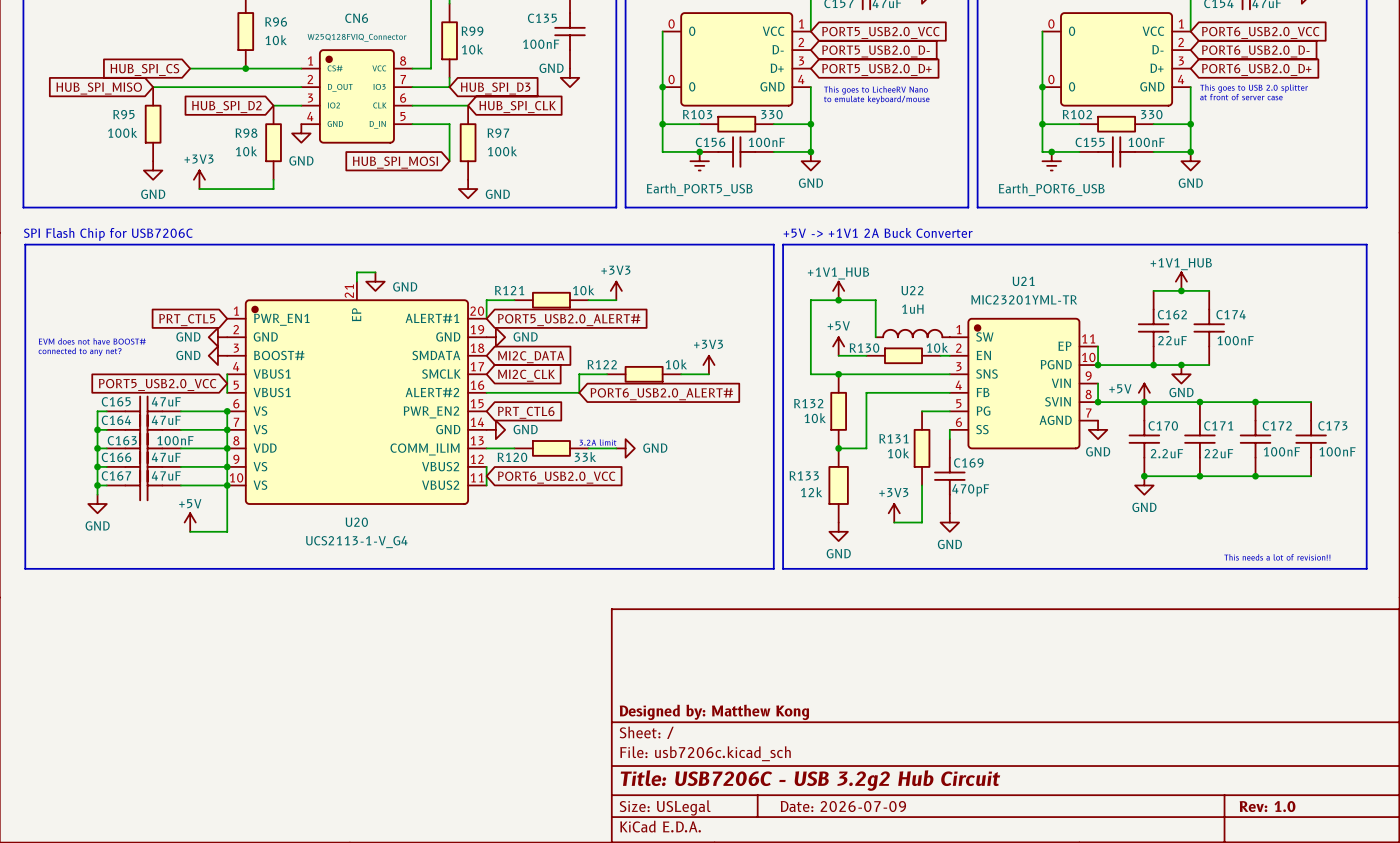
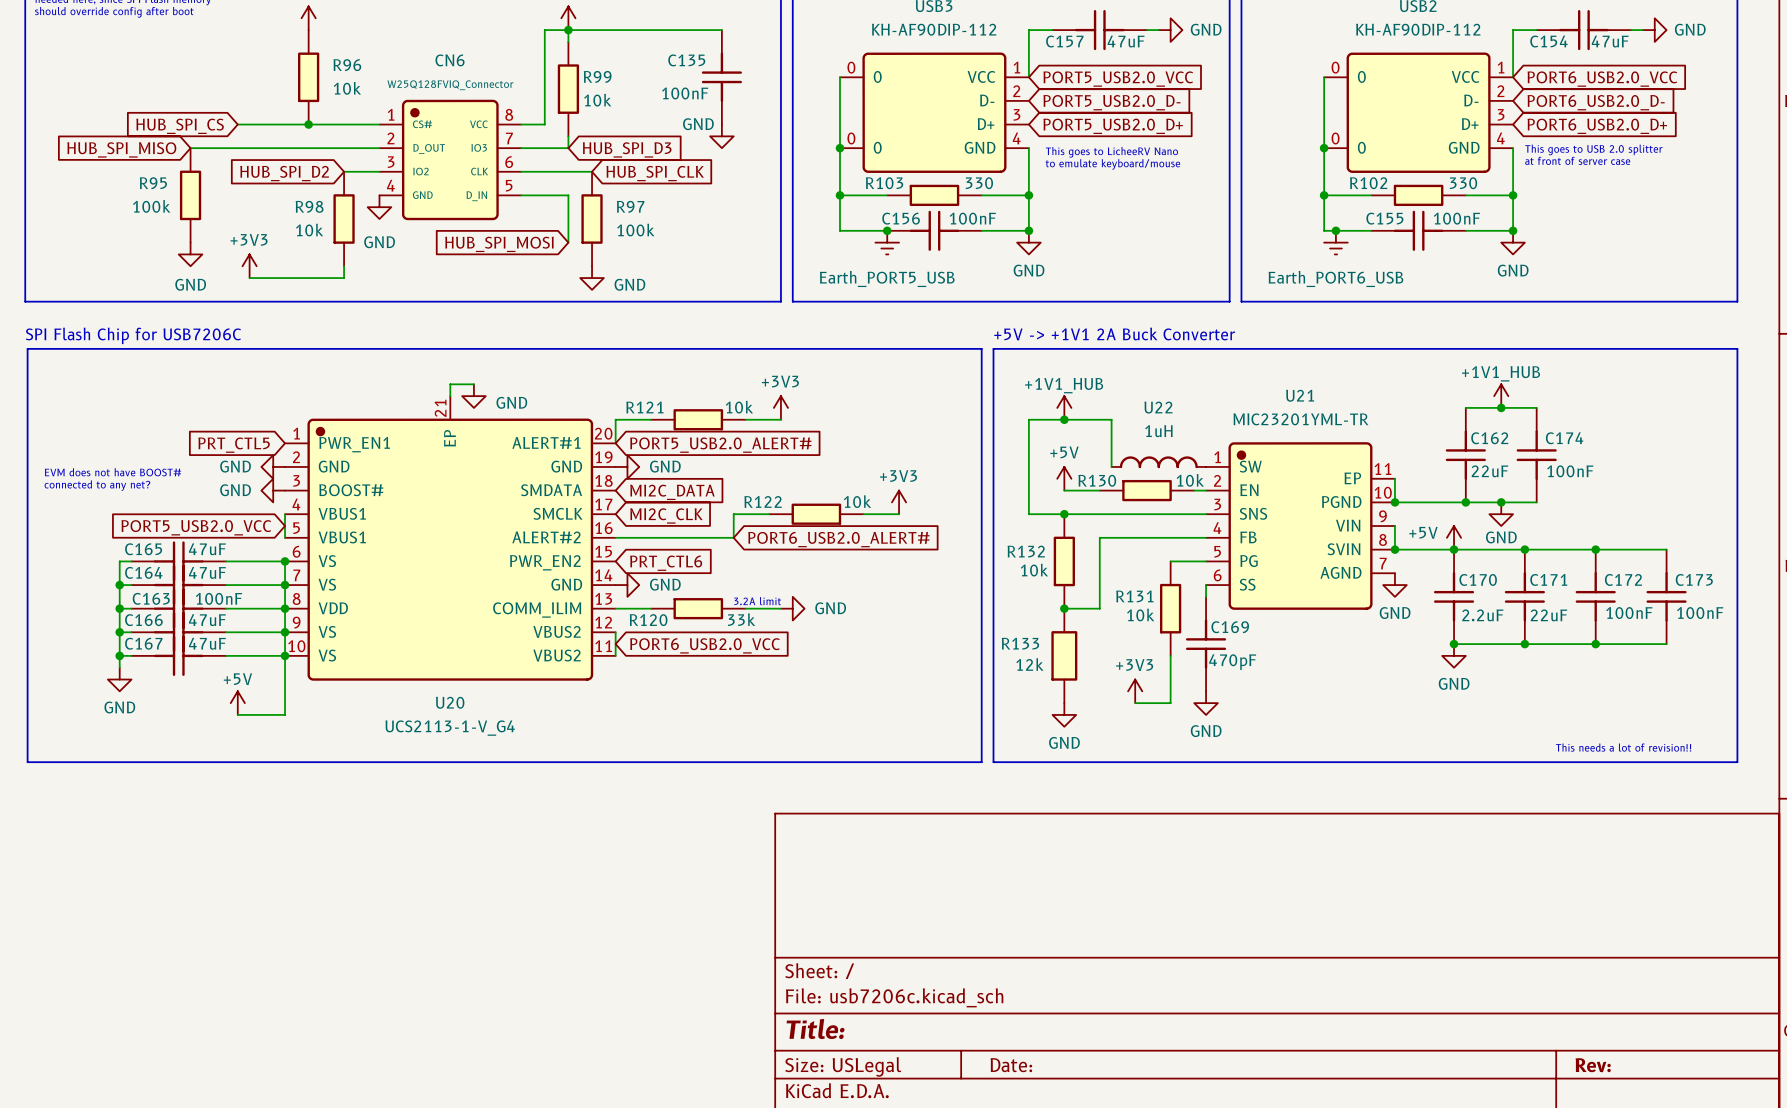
title block: Designed by: Matthew Kong (714, 712) -> none
title block: Title: USB7206C - USB 3.2g2 Hub Circuit (810, 780) -> Title: (815, 1029)
title block: Date: 2026-07-09 (843, 806) -> Date: (1011, 1065)
title block: Rev: 1.0 (1267, 806) -> Rev: (1593, 1065)

